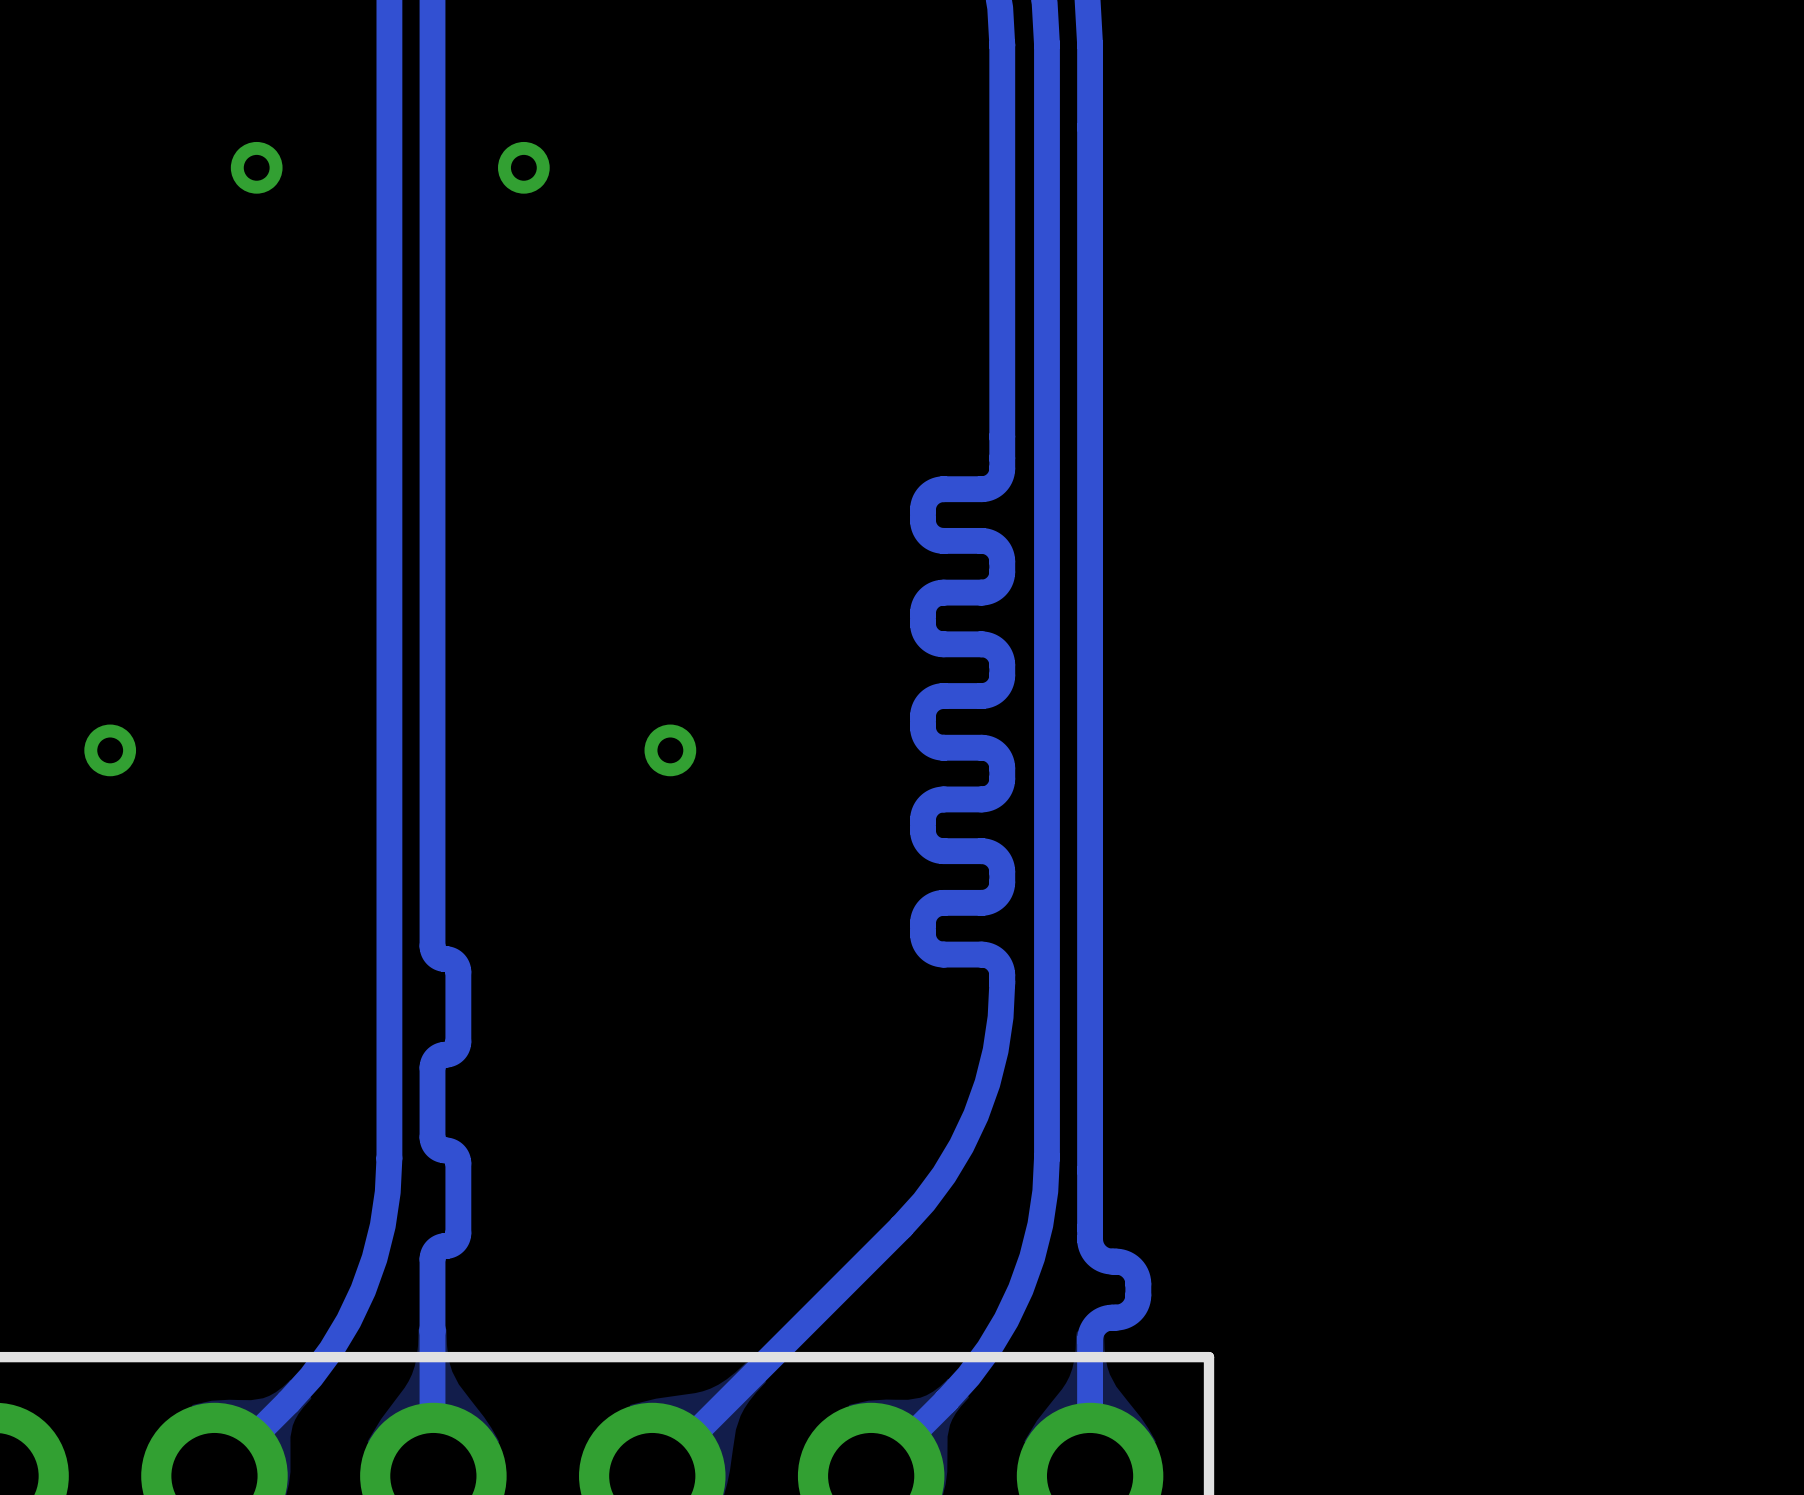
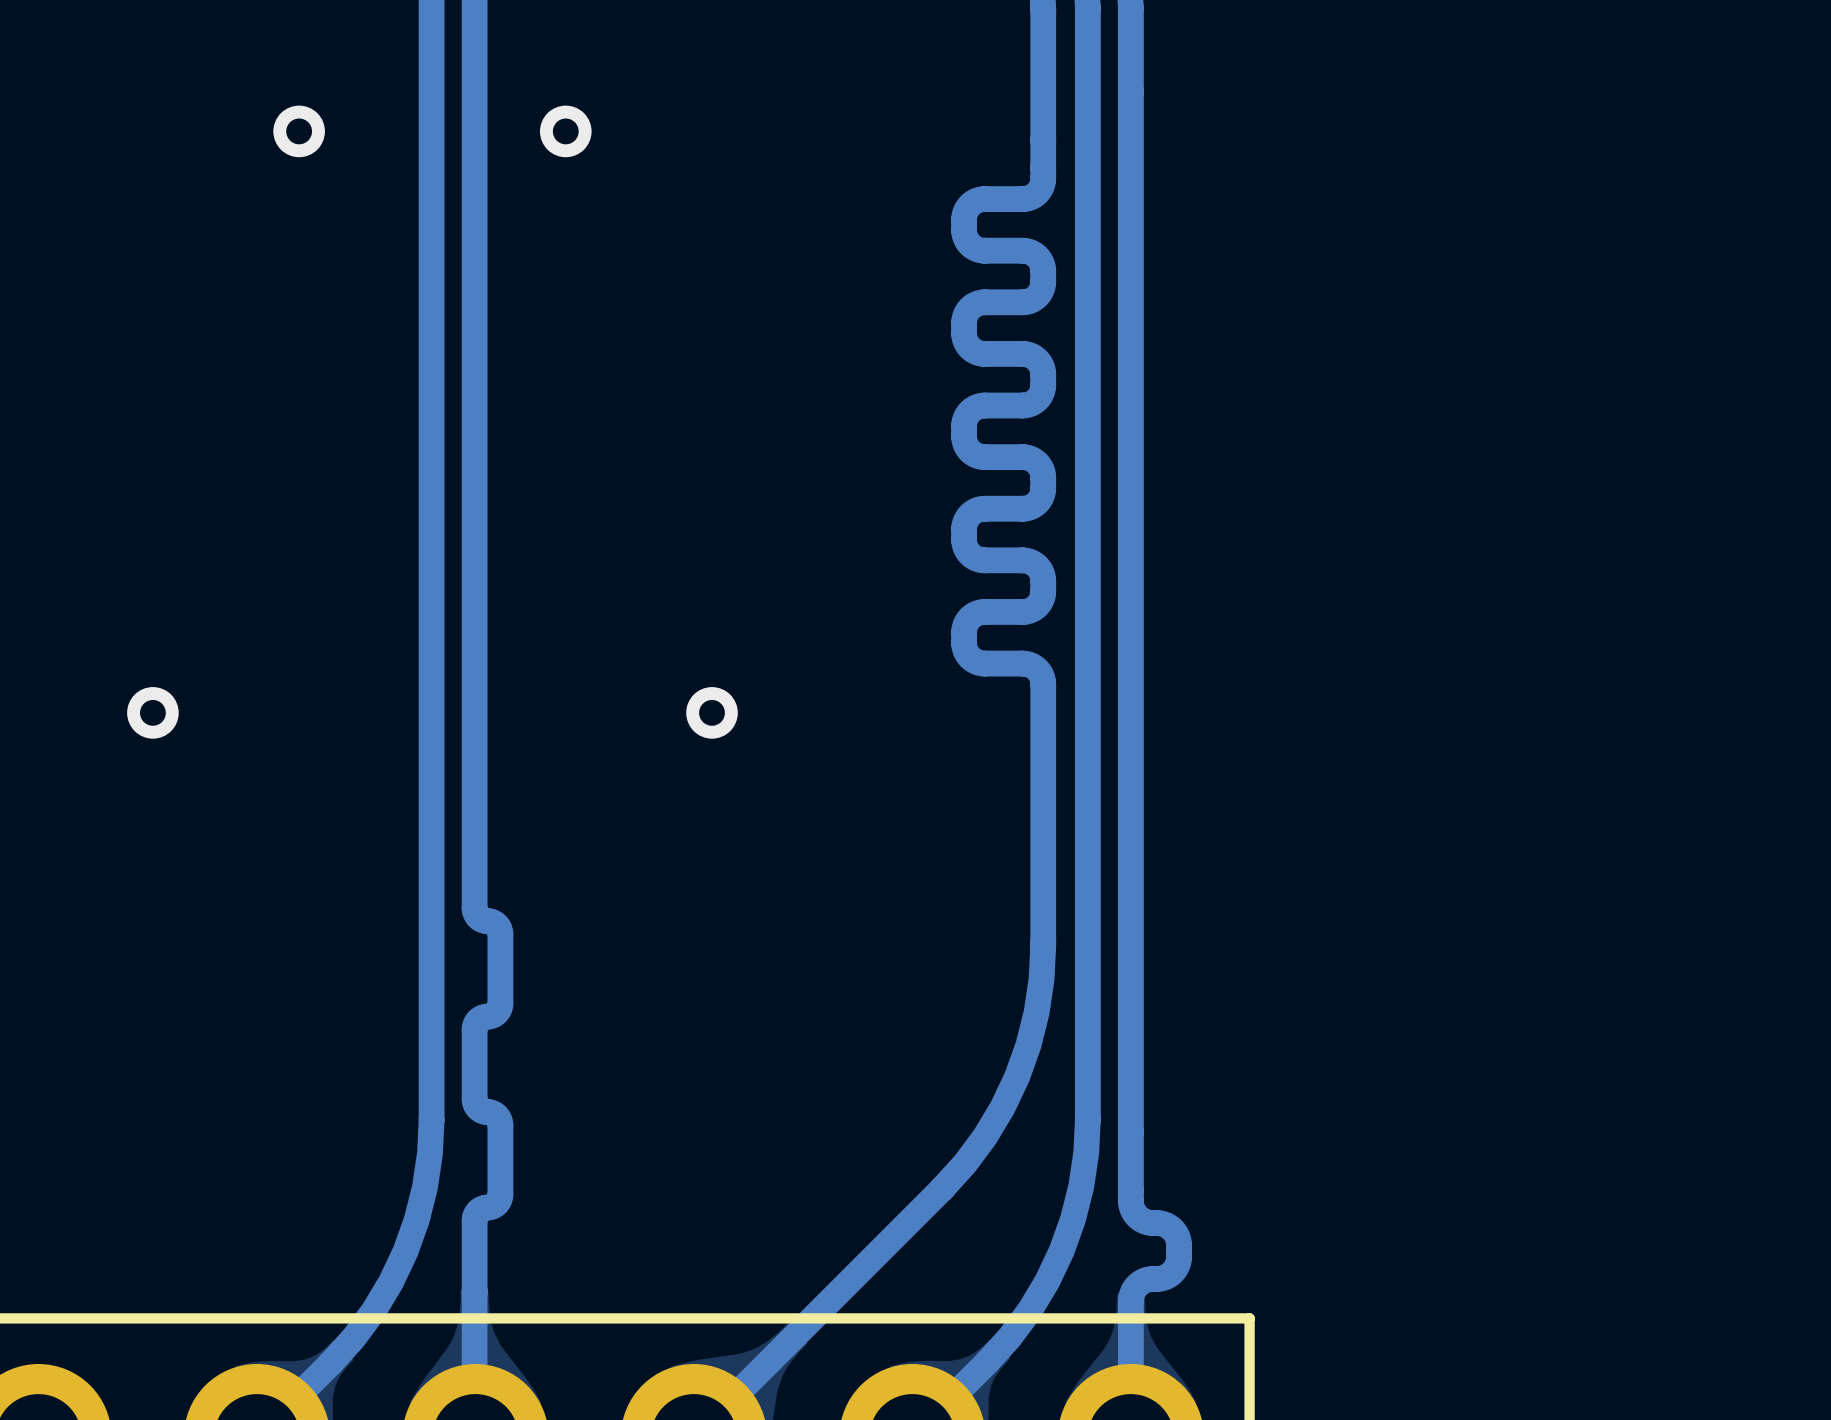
track: (1002, 214) (1002, 308) -> (1043, 178) (1038, 191) (1029, 197) (982, 199) (975, 201) (967, 208) (964, 219) (965, 236) (973, 247) (982, 250) (1029, 251) (1038, 258) (1043, 271)
track: (1002, 318) (1002, 411) -> (1043, 281) (1040, 292) (1031, 300) (1024, 302) (977, 303) (968, 310) (964, 322) (965, 340) (973, 350) (982, 353) (1029, 355) (1038, 361) (1043, 374)
track: (1002, 421) (1002, 470) (996, 483) (983, 489) (936, 490) (926, 498) (922, 509) (924, 527) (932, 537) (941, 540) (988, 542) (997, 548) (1002, 561) (1001, 578) (992, 589) (983, 592) (939, 593) (930, 597) (925, 604) (923, 625) (929, 638) (941, 644) (981, 644) (990, 646) (996, 650) (1001, 658) (1002, 675) (997, 688) (988, 694) (941, 696) (930, 700) (923, 712) (924, 733) (930, 743) (939, 747) (981, 747) (990, 749) (999, 757) (1002, 768) -> (1043, 384) (1040, 395) (1031, 403) (1024, 405) (977, 406) (968, 413) (964, 426) (965, 443) (973, 453) (982, 457) (1027, 457) (1037, 463) (1042, 473) (1042, 492) (1035, 504) (1024, 508) (977, 509) (967, 518) (964, 529) (965, 546) (970, 554) (975, 558) (984, 560) (1024, 560) (1037, 566) (1043, 578) (1041, 600) (1035, 607) (1027, 611) (982, 612) (973, 615) (965, 625) (964, 642) (967, 653) (977, 662) (1024, 663) (1037, 669) (1043, 681) (1043, 730)
track: (1002, 778) (999, 789) (990, 797) (983, 799) (936, 800) (926, 809) (922, 820) (924, 837) (932, 847) (941, 851) (988, 852) (999, 860) (1002, 871) -> (1043, 741) (1043, 834)
track: (1002, 882) (999, 893) (990, 900) (983, 902) (936, 904) (926, 912) (922, 923) (924, 940) (932, 951) (941, 954) (988, 955) (999, 964) (1002, 975) -> (1043, 844) (1043, 937)

